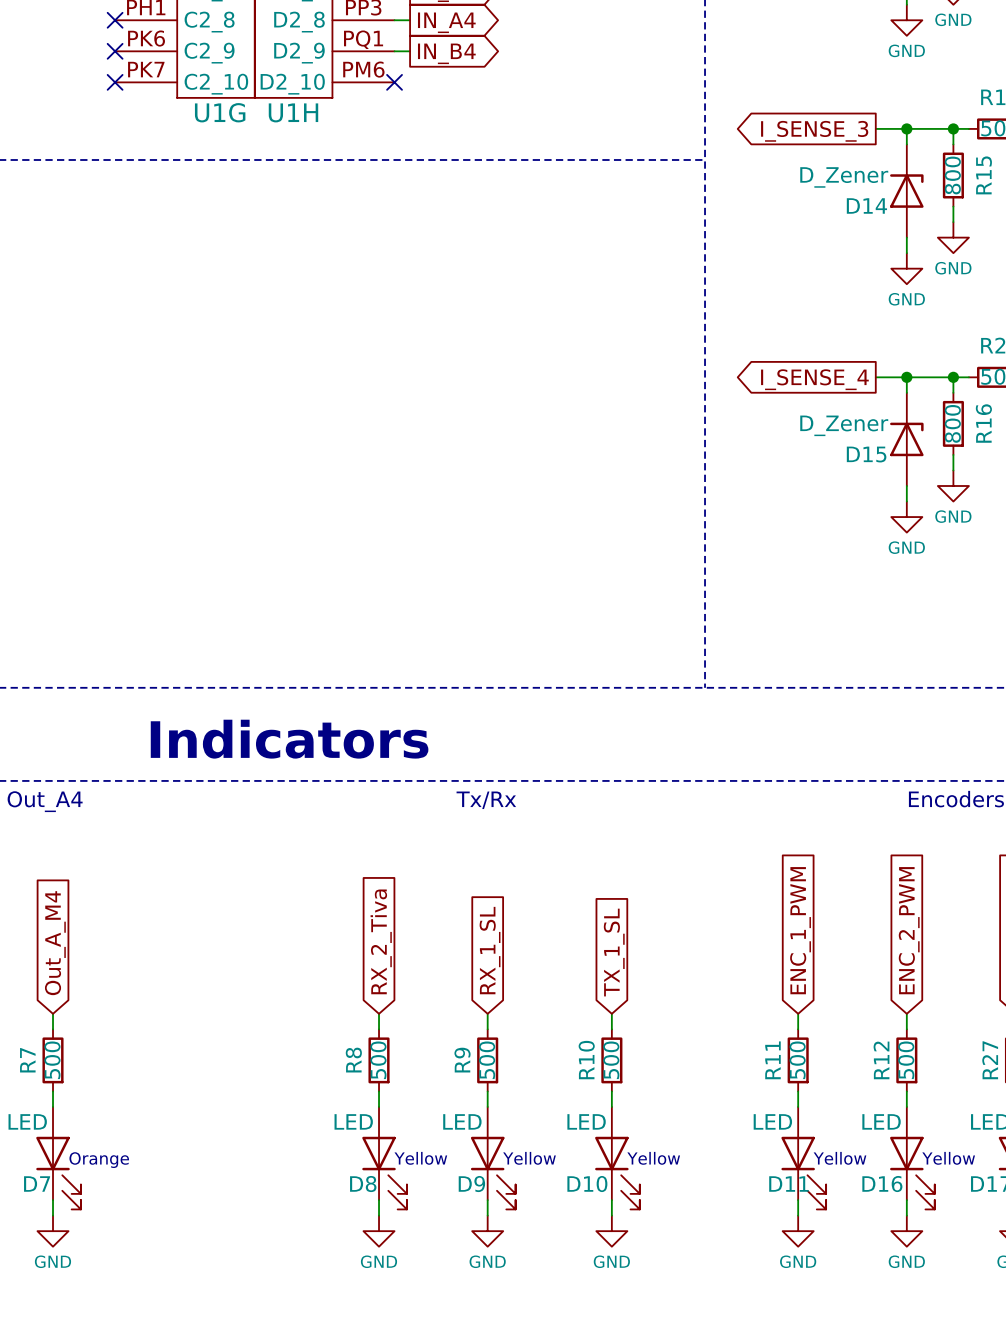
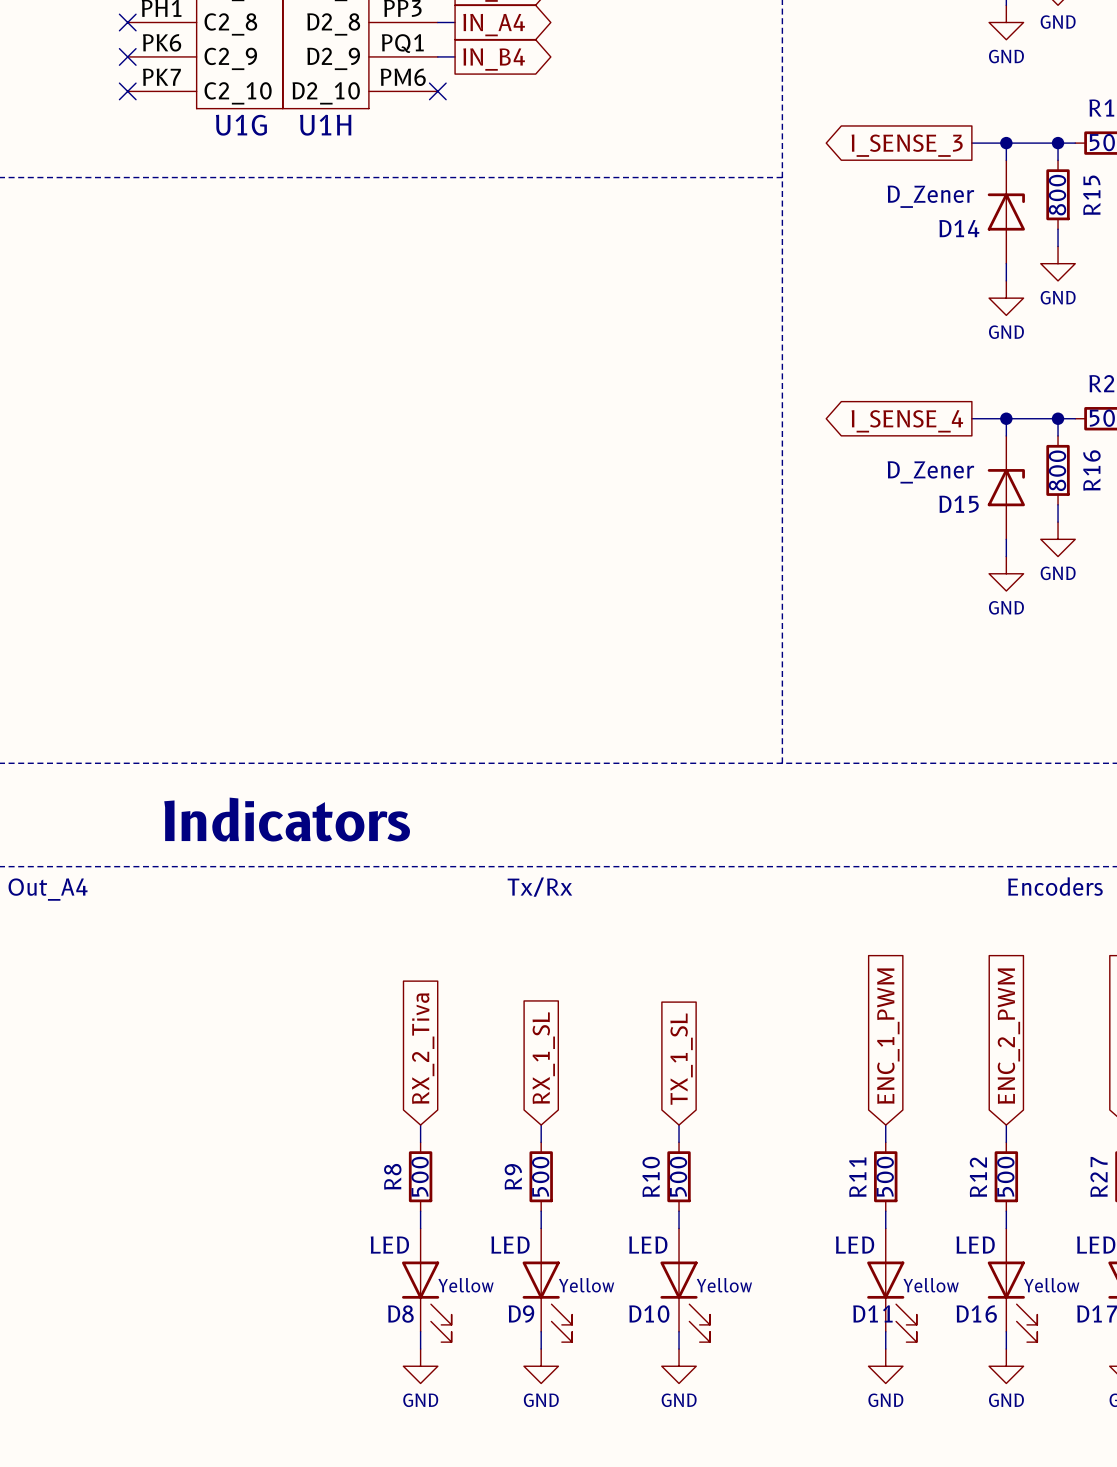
global label: Out_A_M4 (55, 943) -> none
wire: (53, 1013) (53, 1029) -> none
R7: 500 (53, 1060) -> none
wire: (53, 1091) (53, 1106) -> none
D7: LED (58, 1158) -> none
text: Orange (99, 1160) -> none
wire: (53, 1200) (53, 1215) -> none
power symbol: GND (53, 1231) -> none

